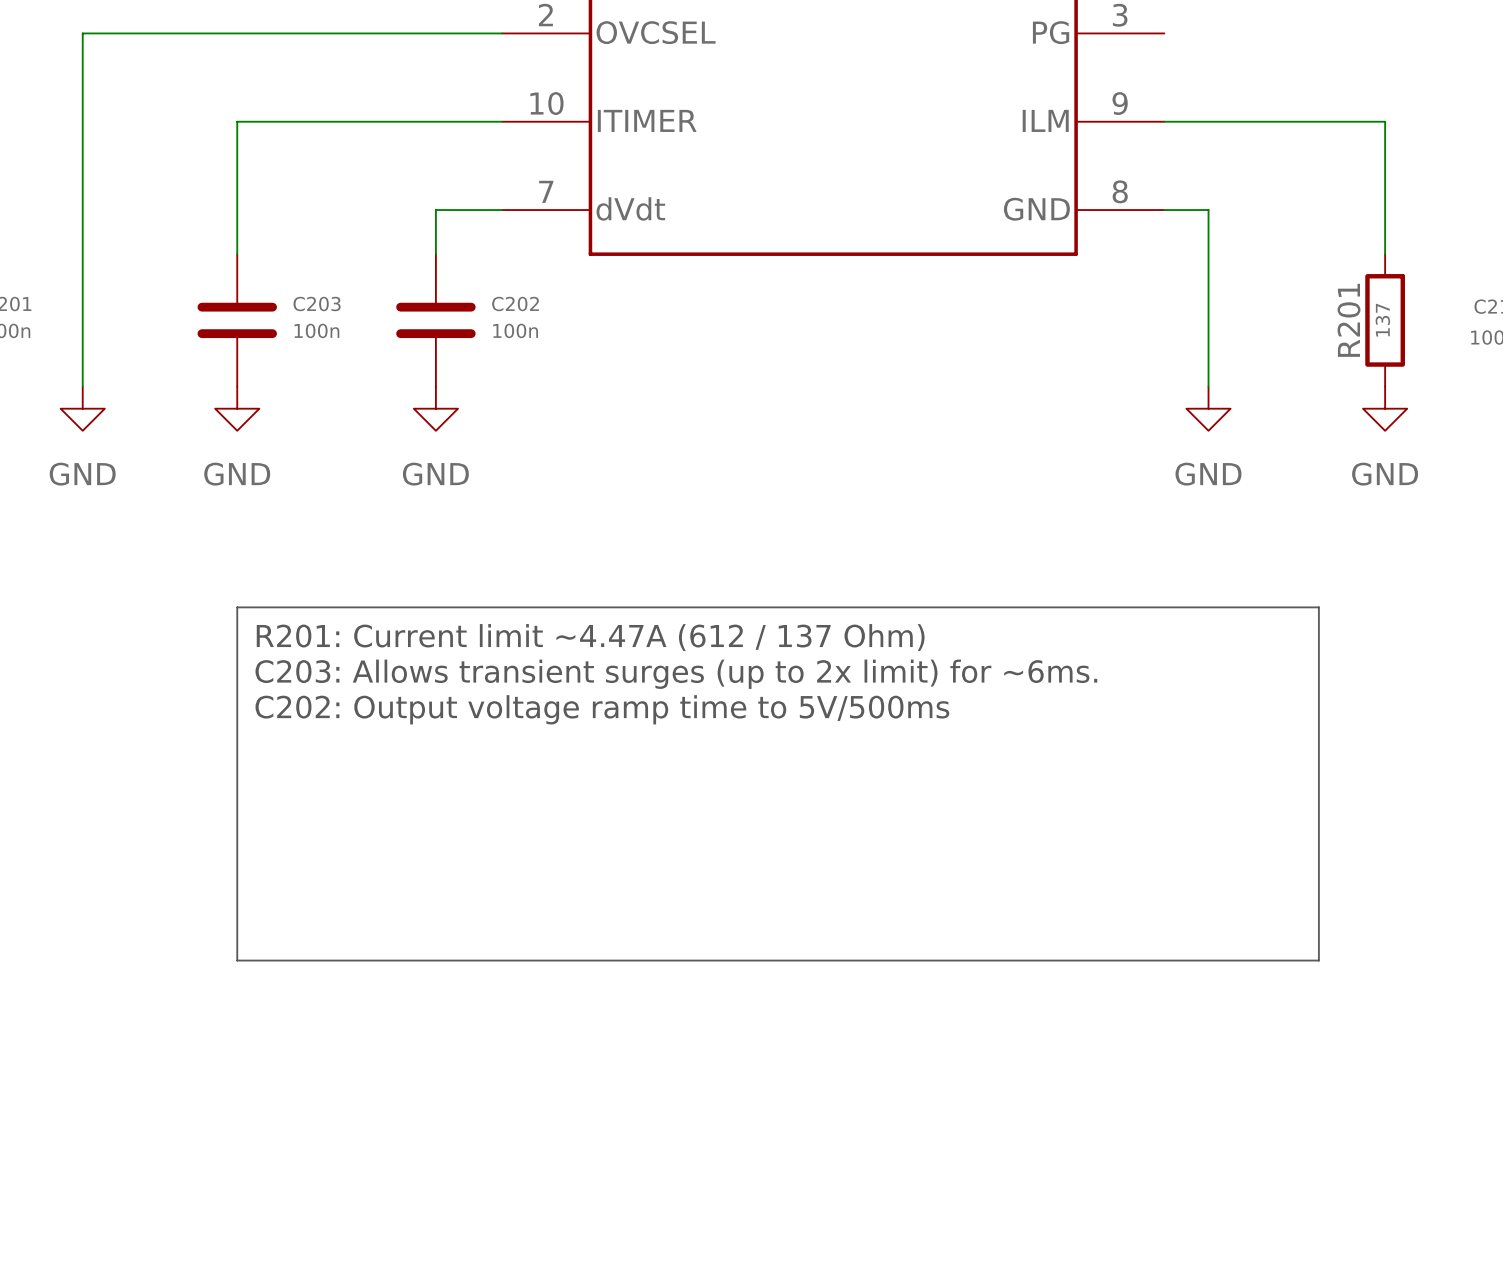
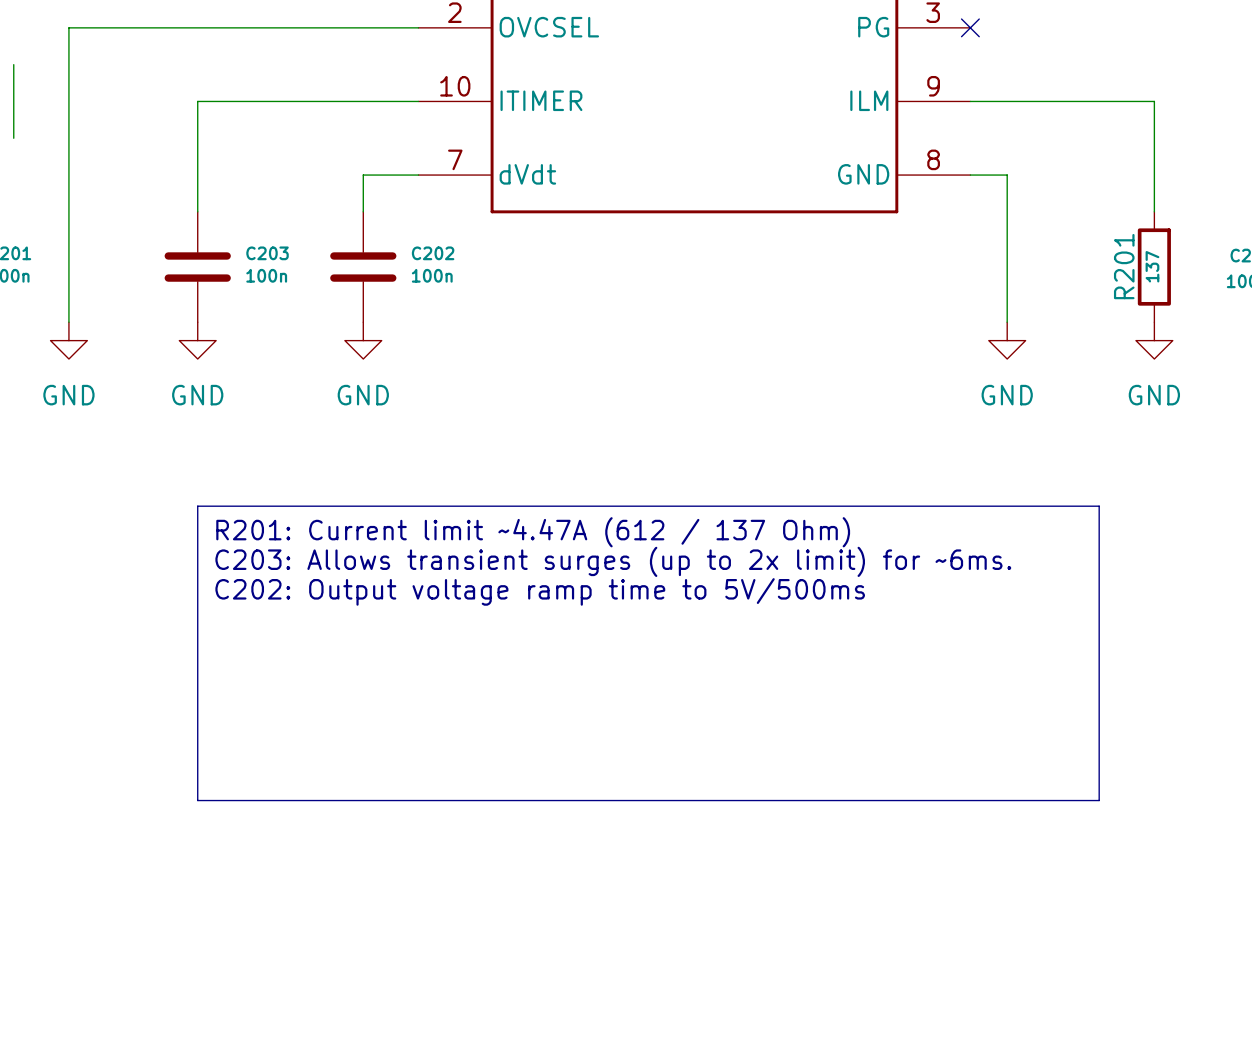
no-connect mark: none -> (970, 27)
wire: none -> (13, 64) (13, 138)

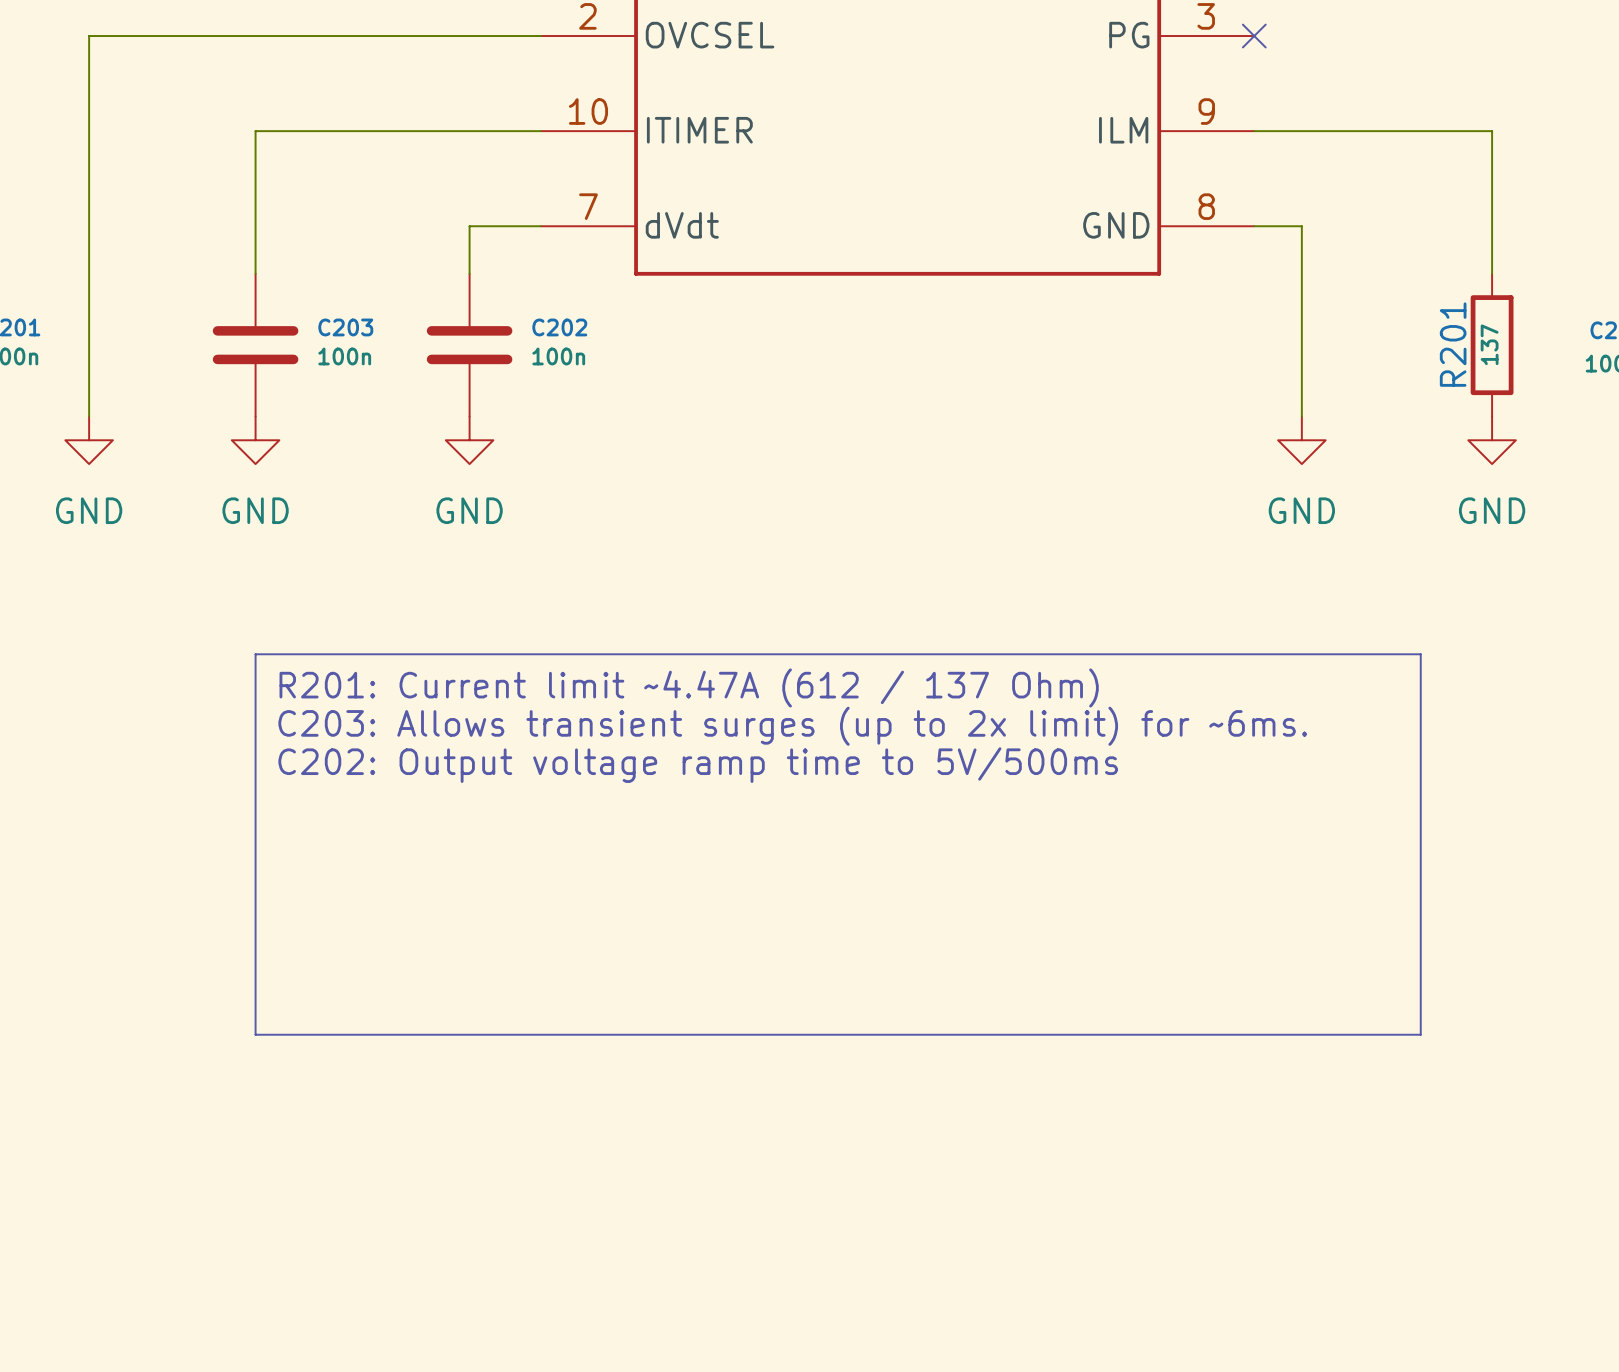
wire: (13, 64) (13, 138) -> none

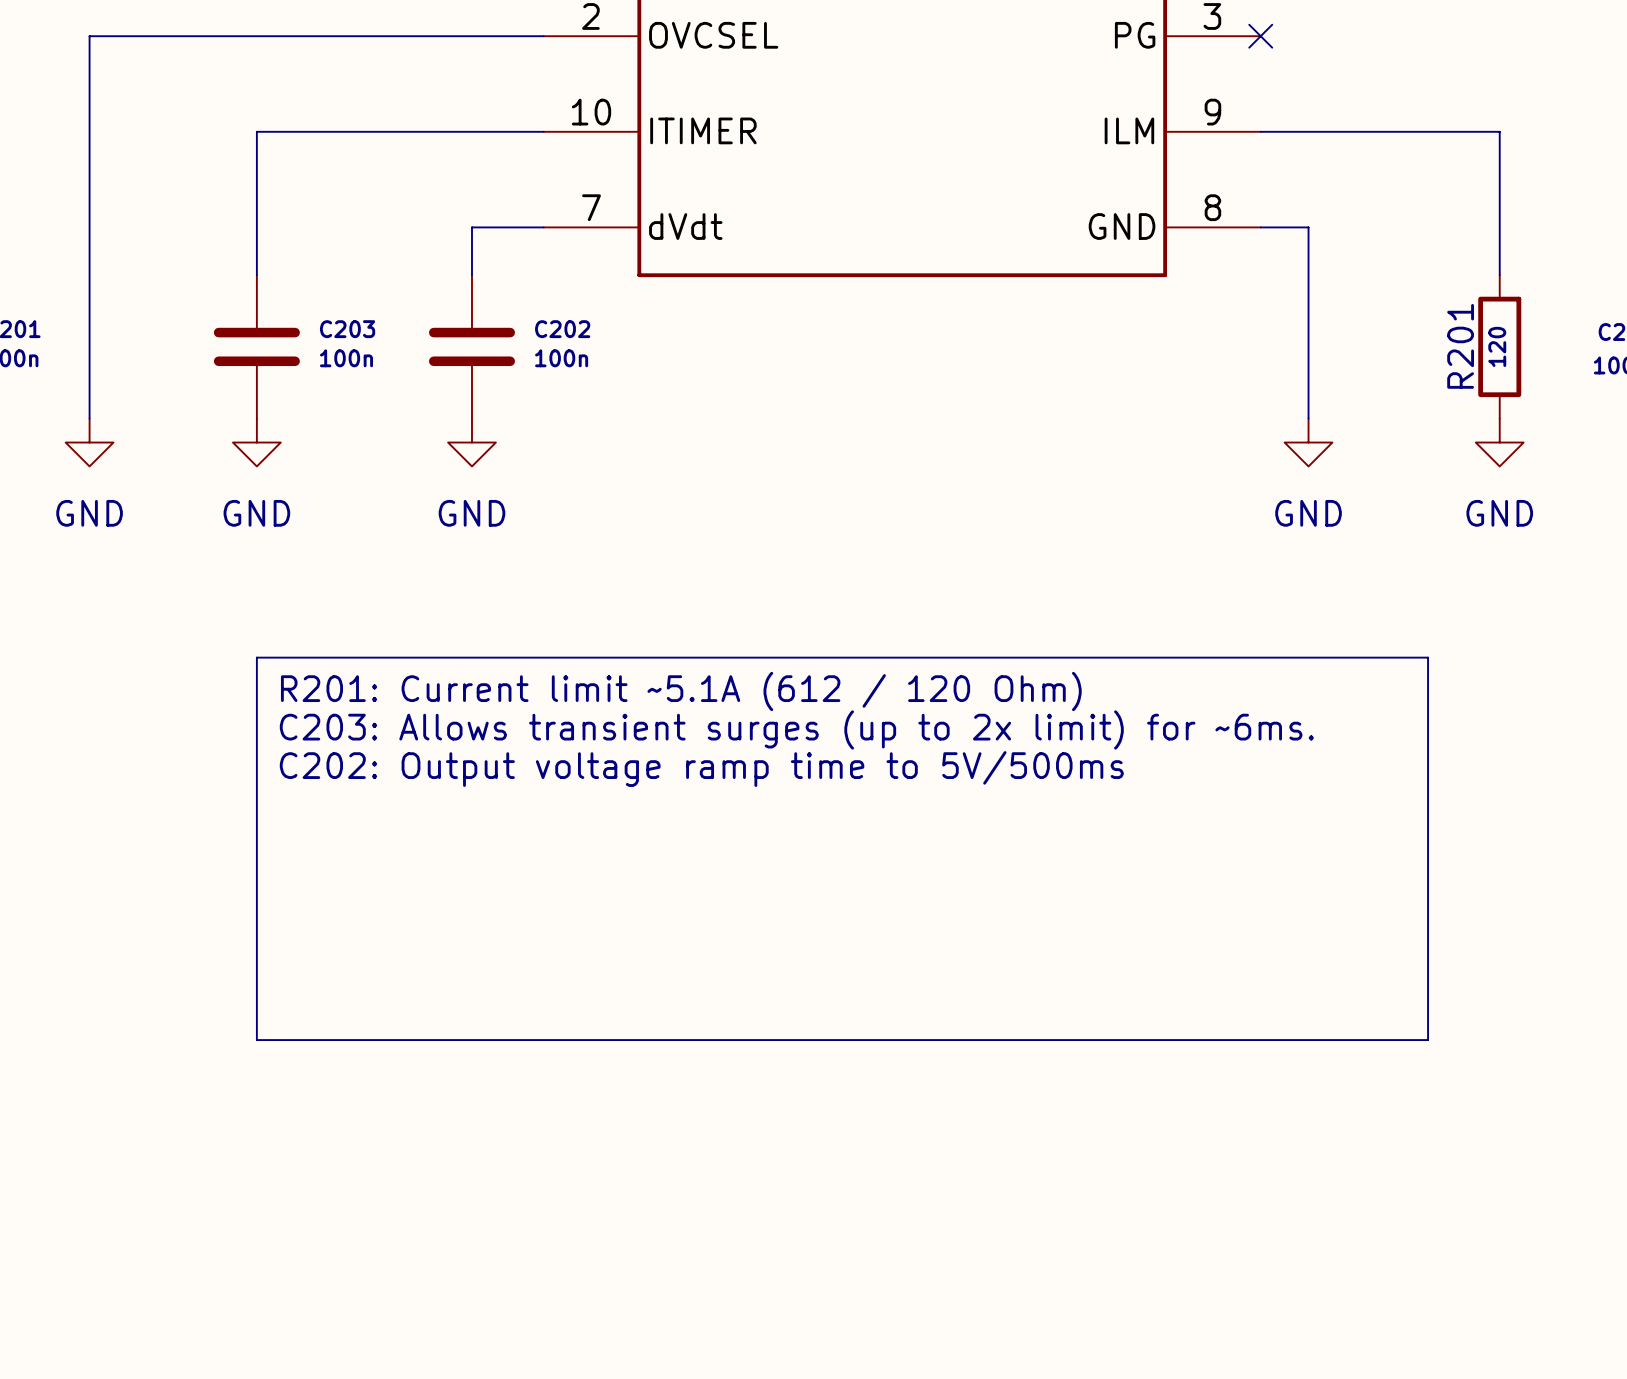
R201 value: 137 (1489, 344) -> 120 (1497, 346)
text: R201: Current limit ~4.47A (612 / 137 Ohm) (689, 687) -> R201: Current limit ~5.1A (612 / 120 Ohm) (681, 691)

